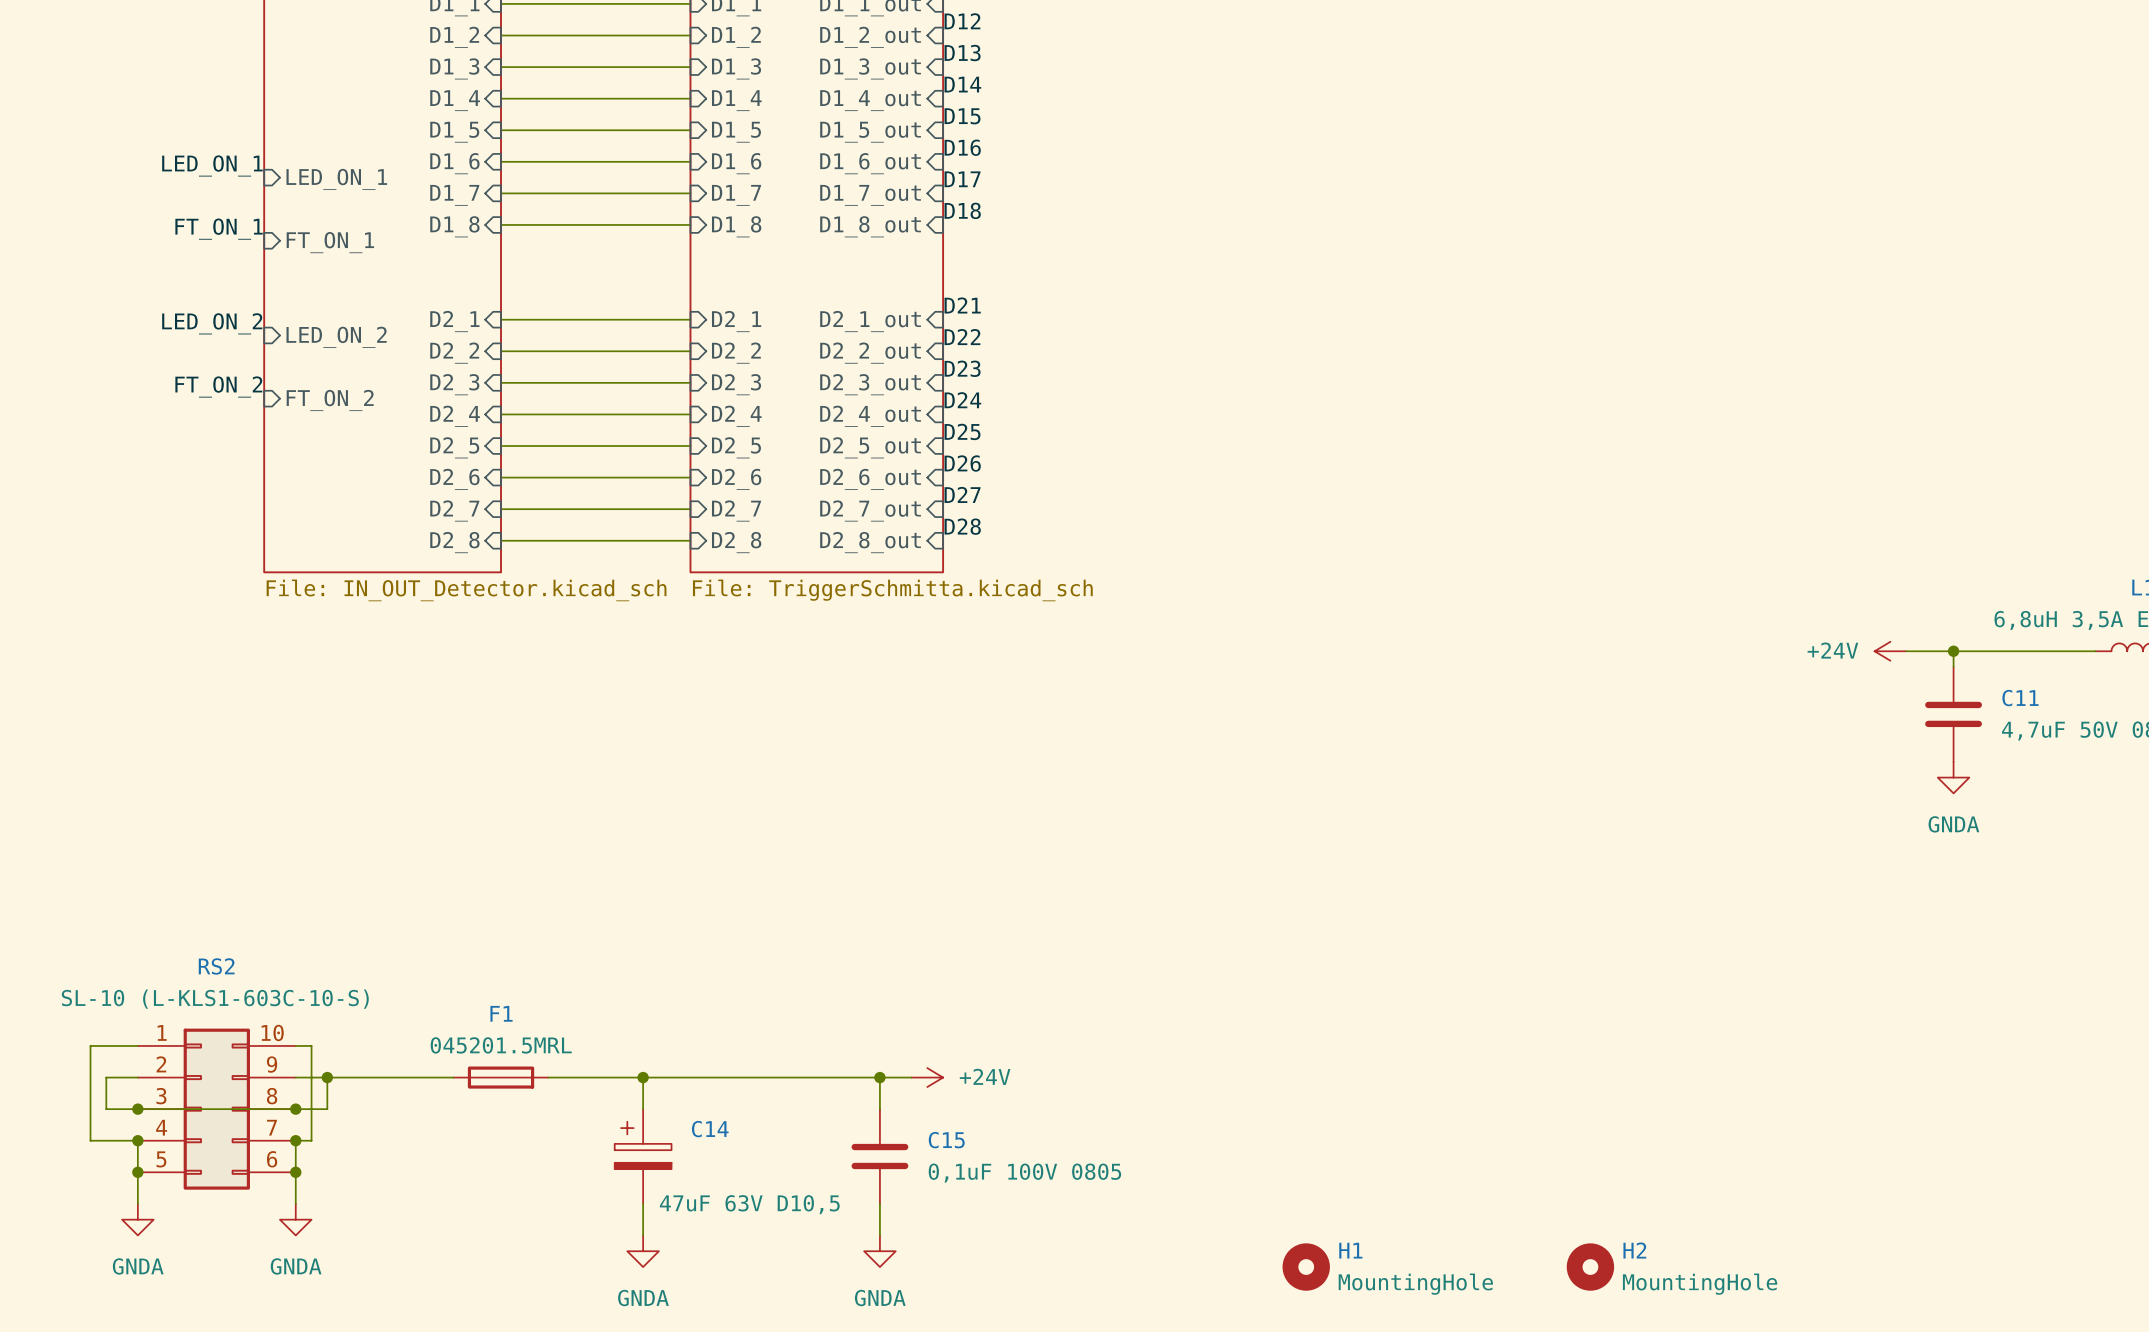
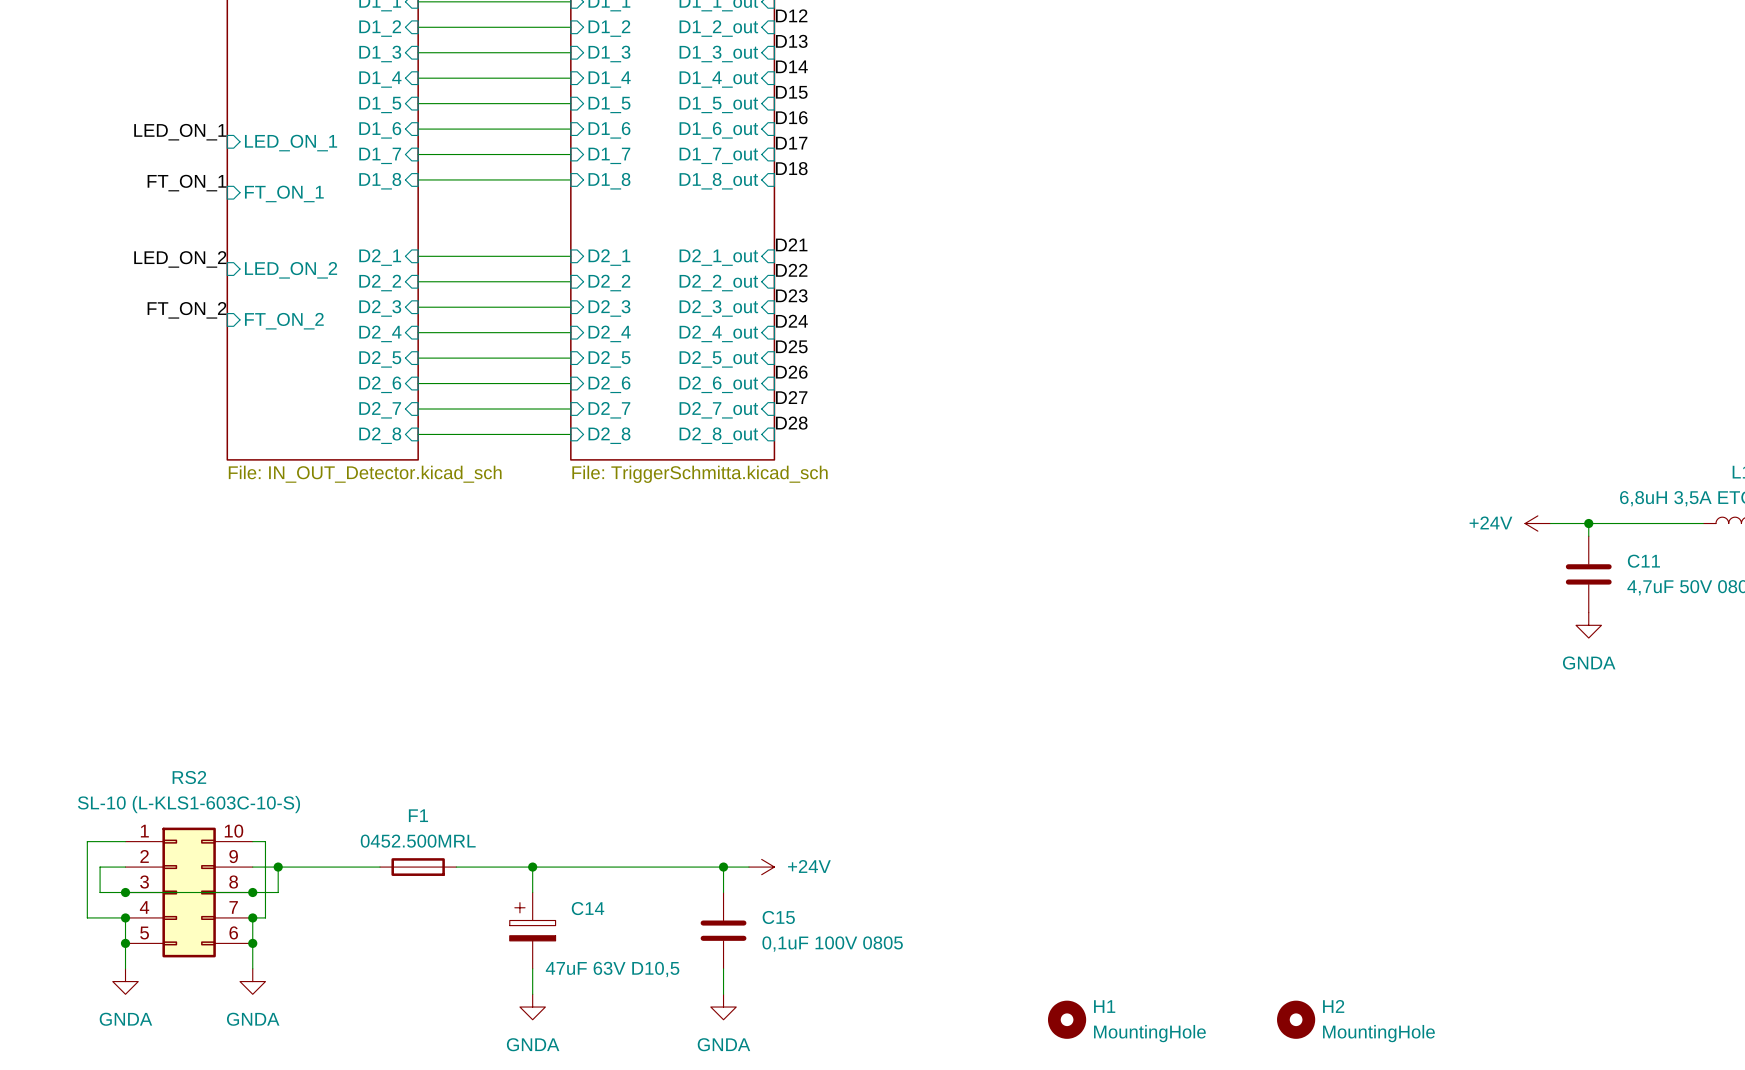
F1 value: 045201.5MRL (501, 1045) -> 0452.500MRL (418, 841)

